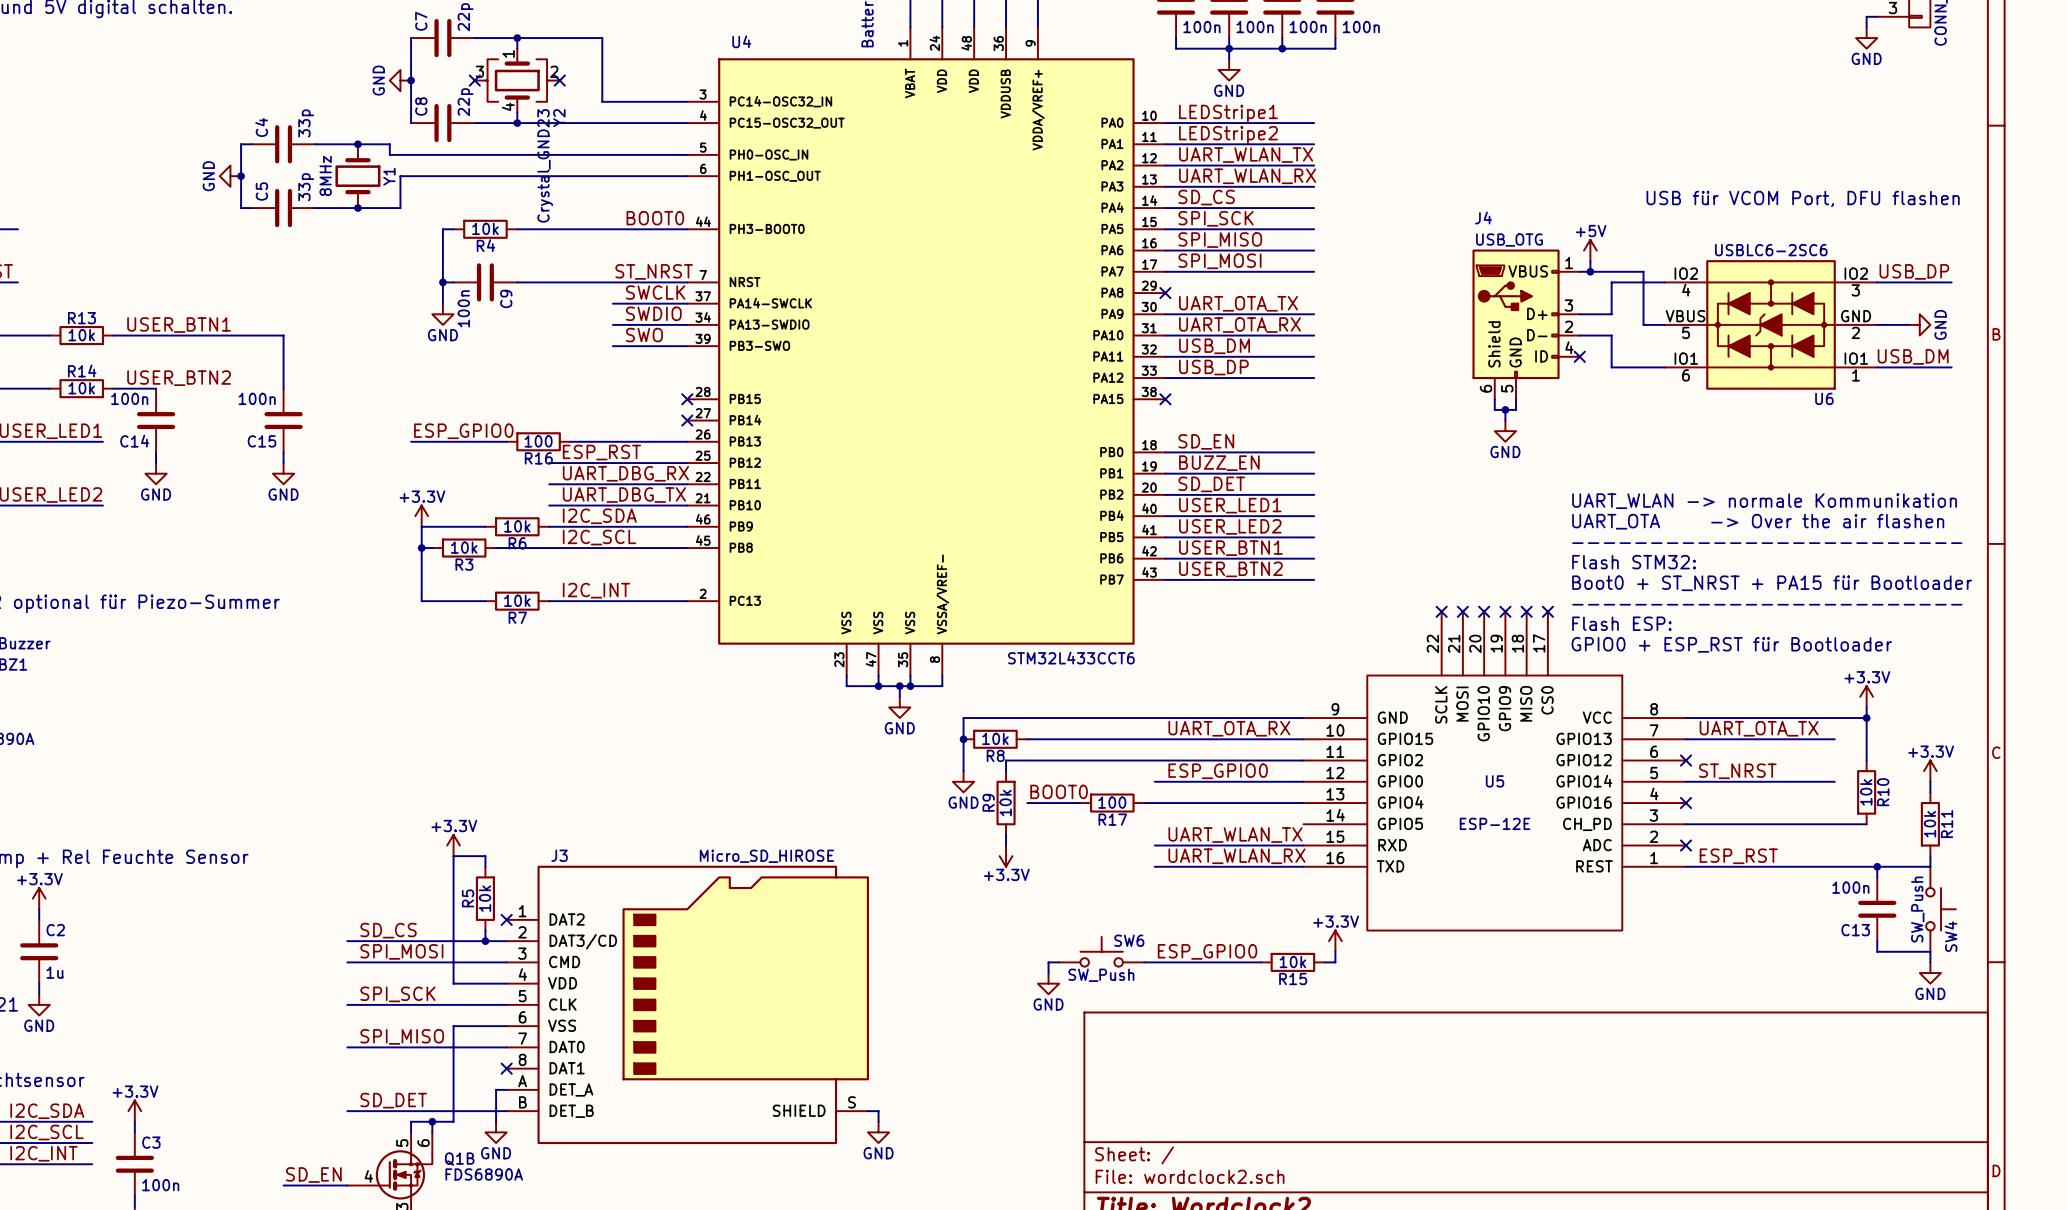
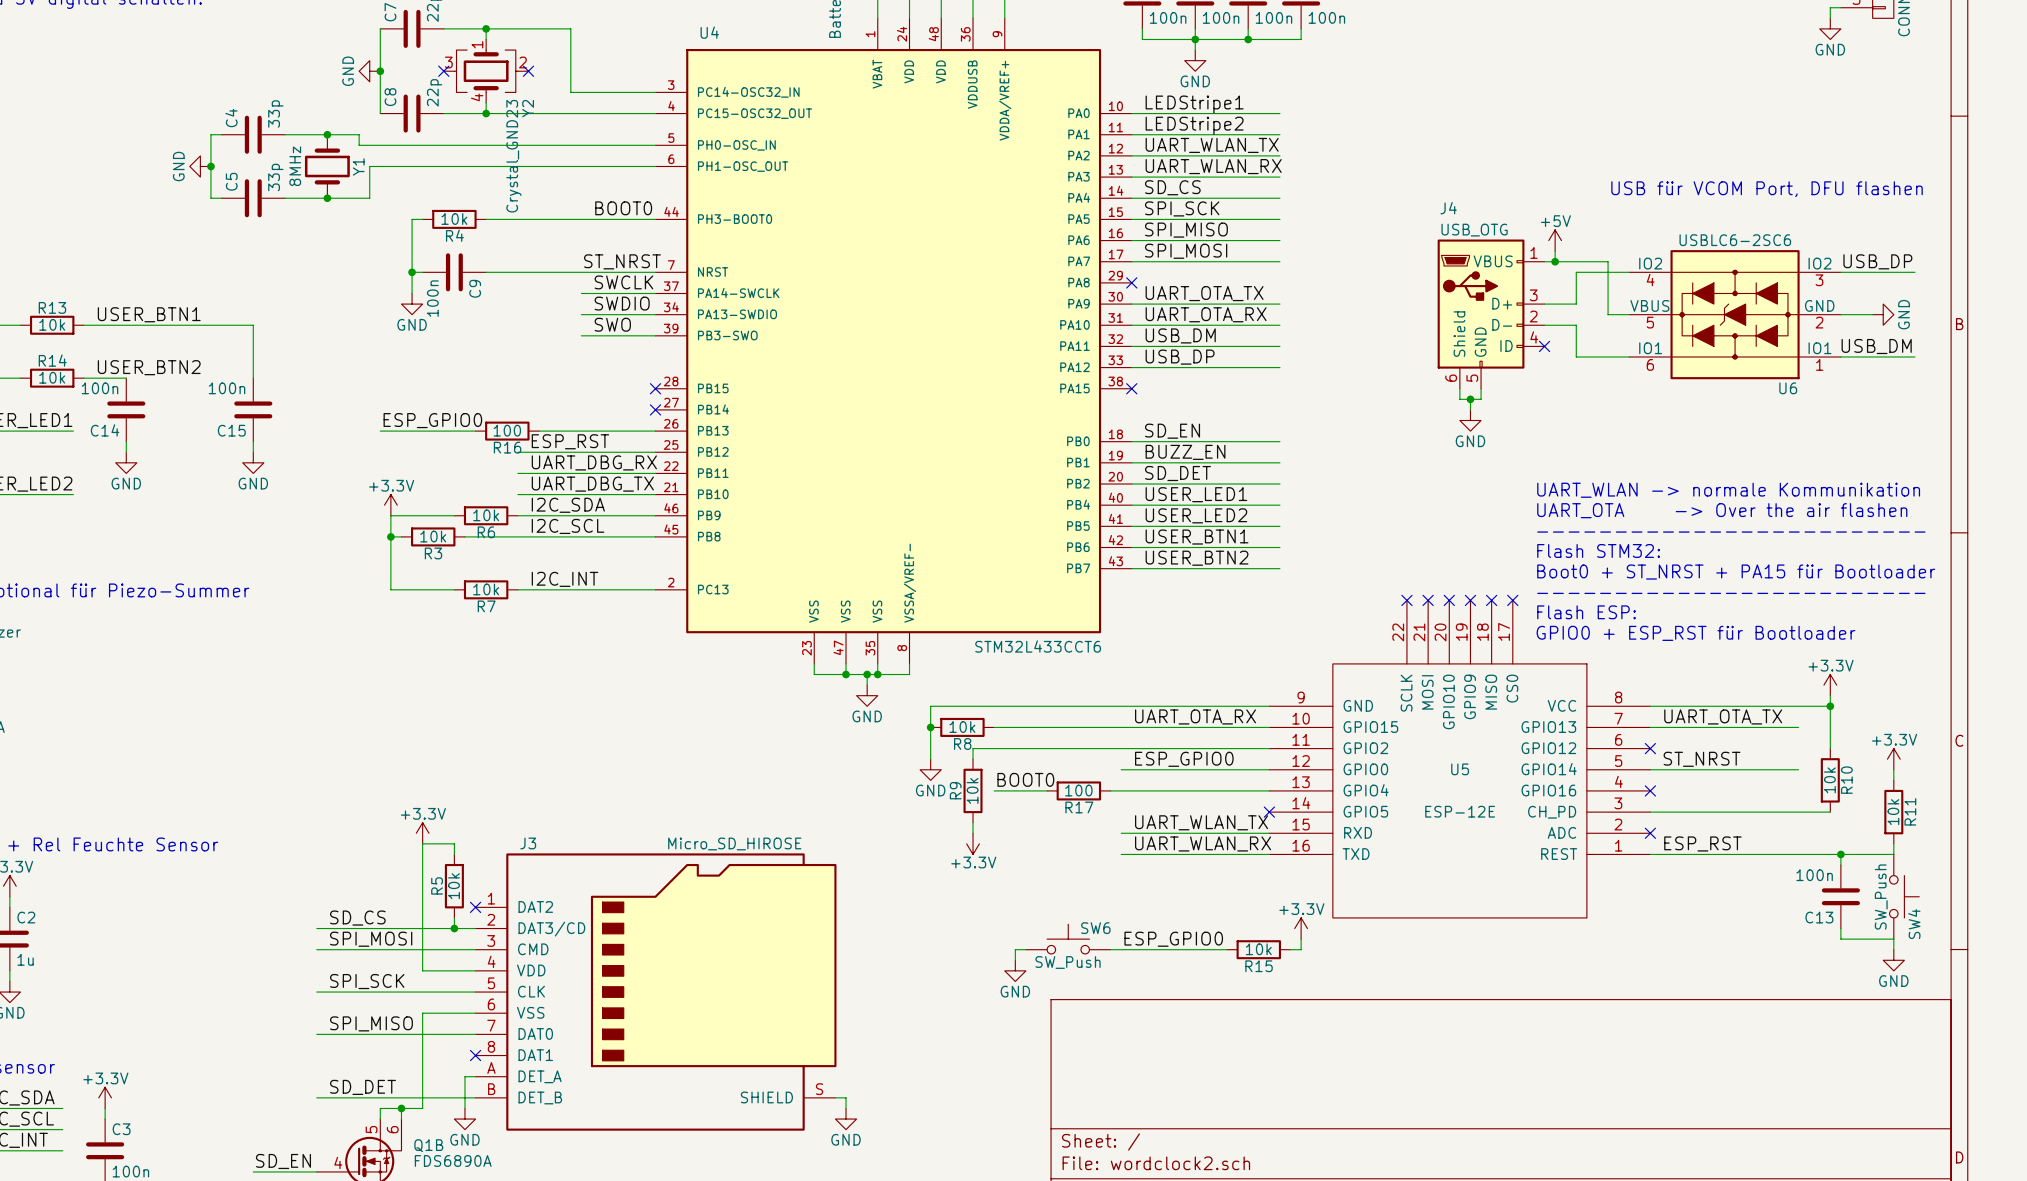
no-connect mark: none -> (1269, 812)

